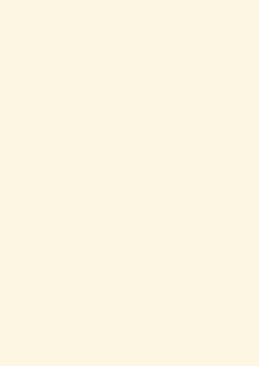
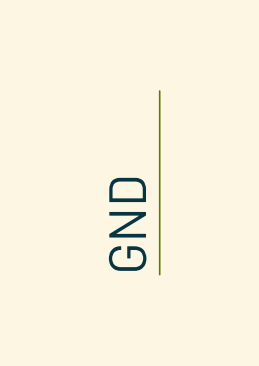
wire: none -> (159, 91) (159, 274)
label: none -> GND (127, 224)

